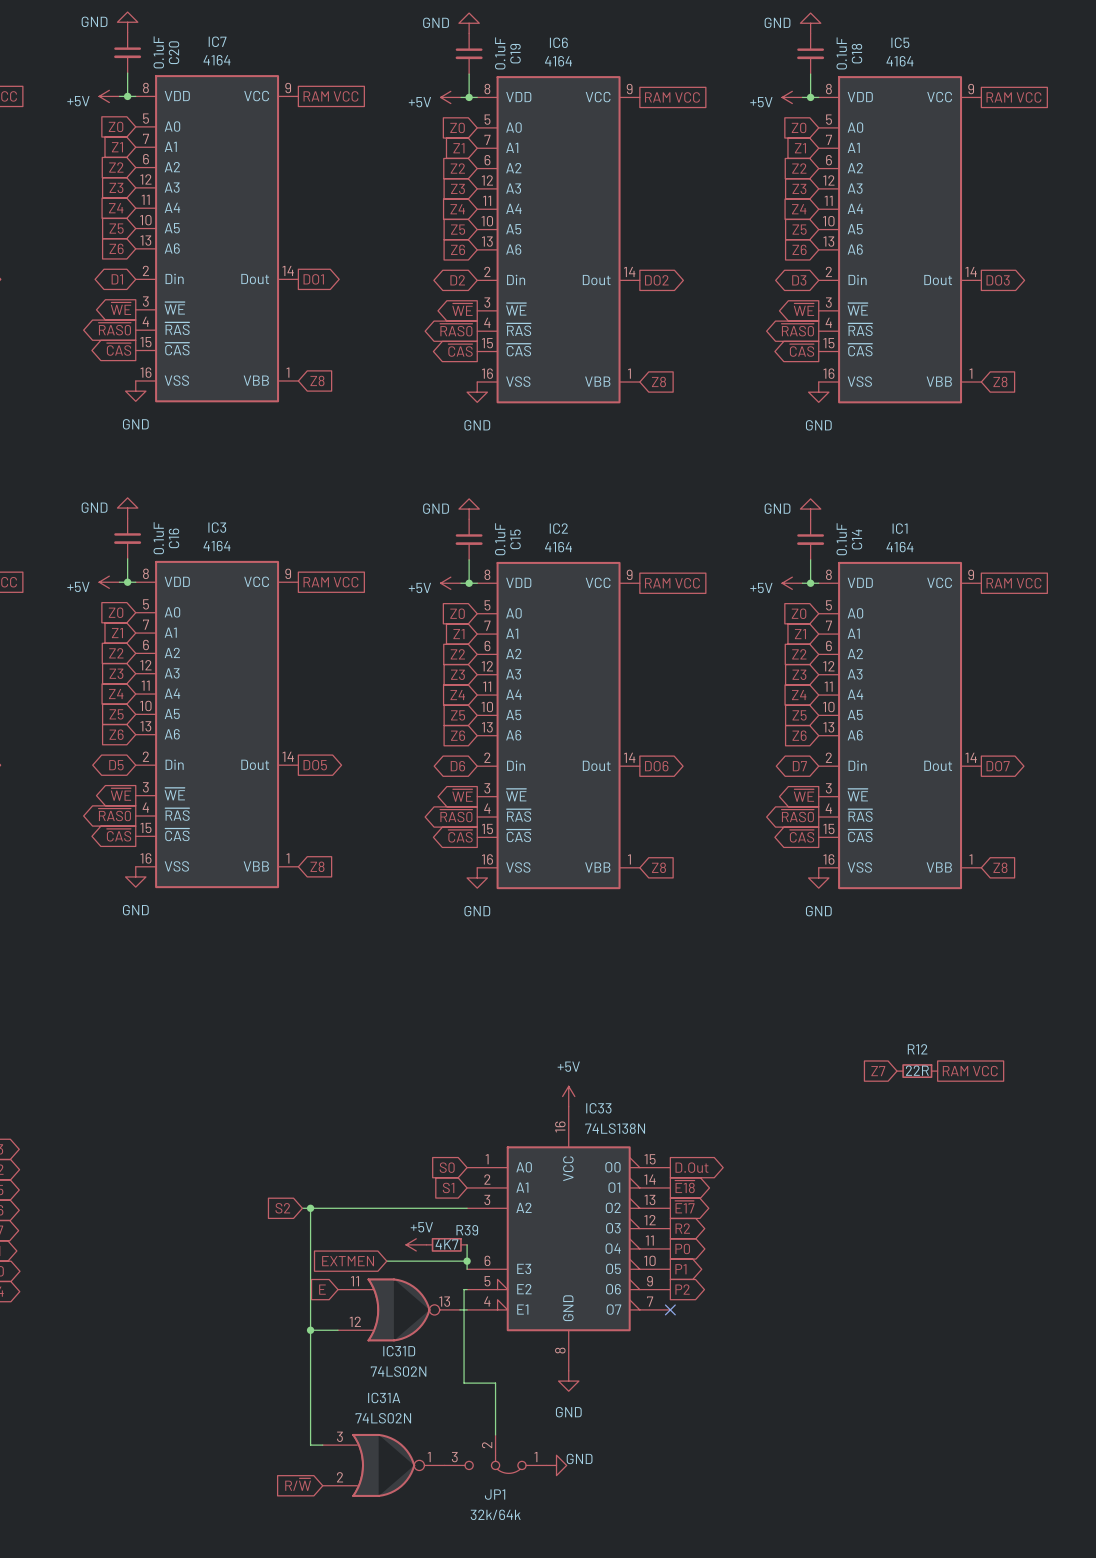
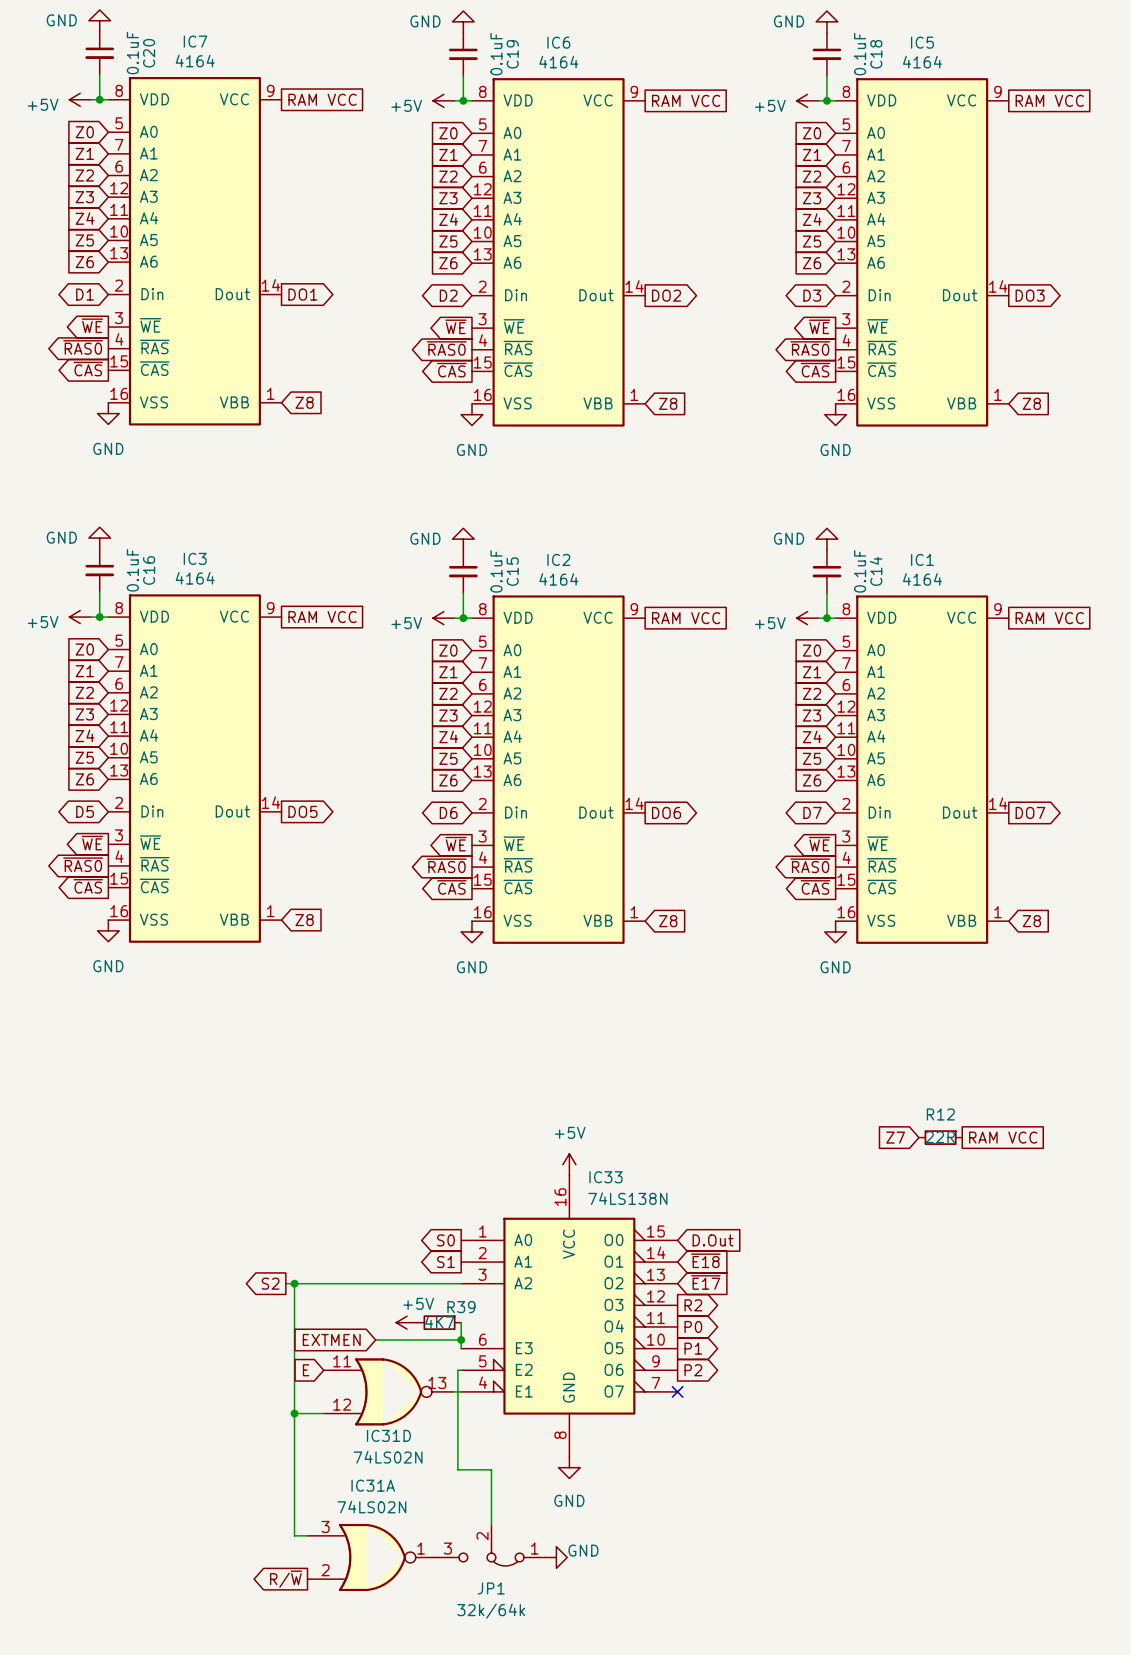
global label shape: input (447, 1167) -> output (445, 1240)
global label shape: output (691, 1167) -> input (713, 1240)
global label shape: output (684, 1186) -> input (705, 1260)
global label shape: input (448, 1187) -> output (445, 1262)
global label shape: output (684, 1207) -> input (705, 1282)
global label shape: input (282, 1208) -> output (270, 1283)
global label shape: input (298, 1484) -> output (286, 1579)

